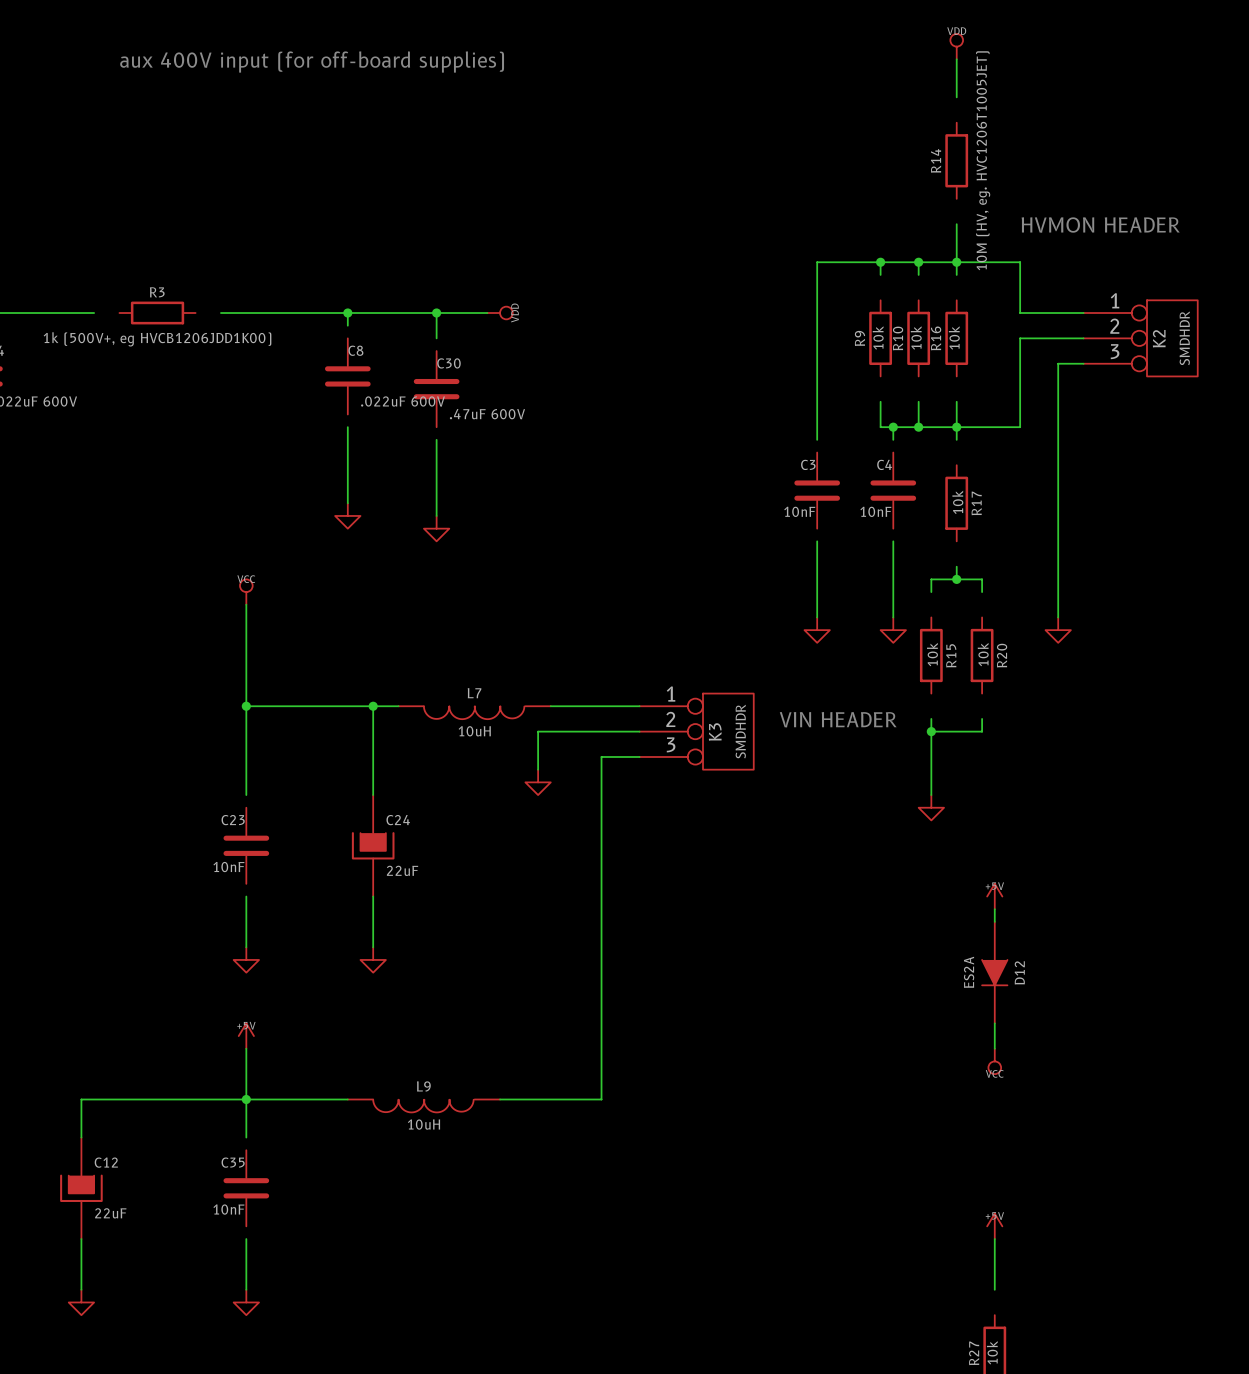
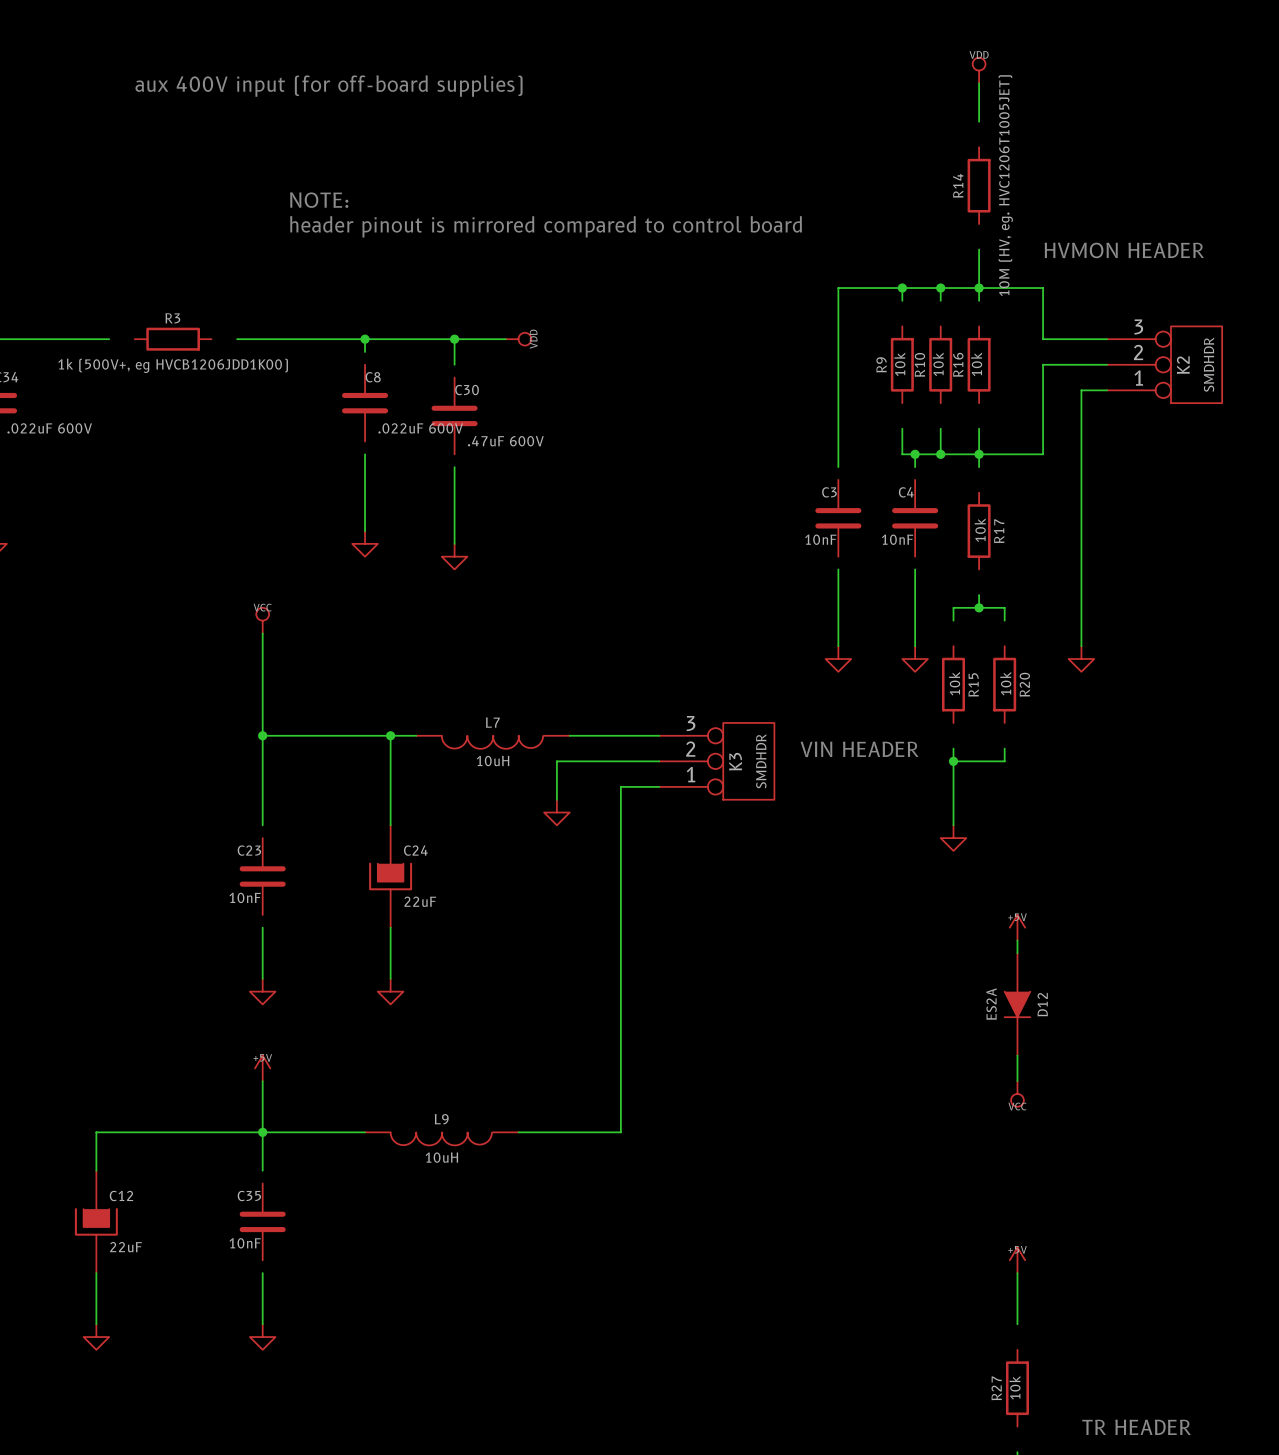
text: none -> NOTE: (319, 200)
text: none -> header pinout is mirrored compared to control board (546, 226)
K2 flip: as is (1172, 338) -> up-down (1196, 364)
K3 flip: as is (728, 731) -> up-down (748, 761)

